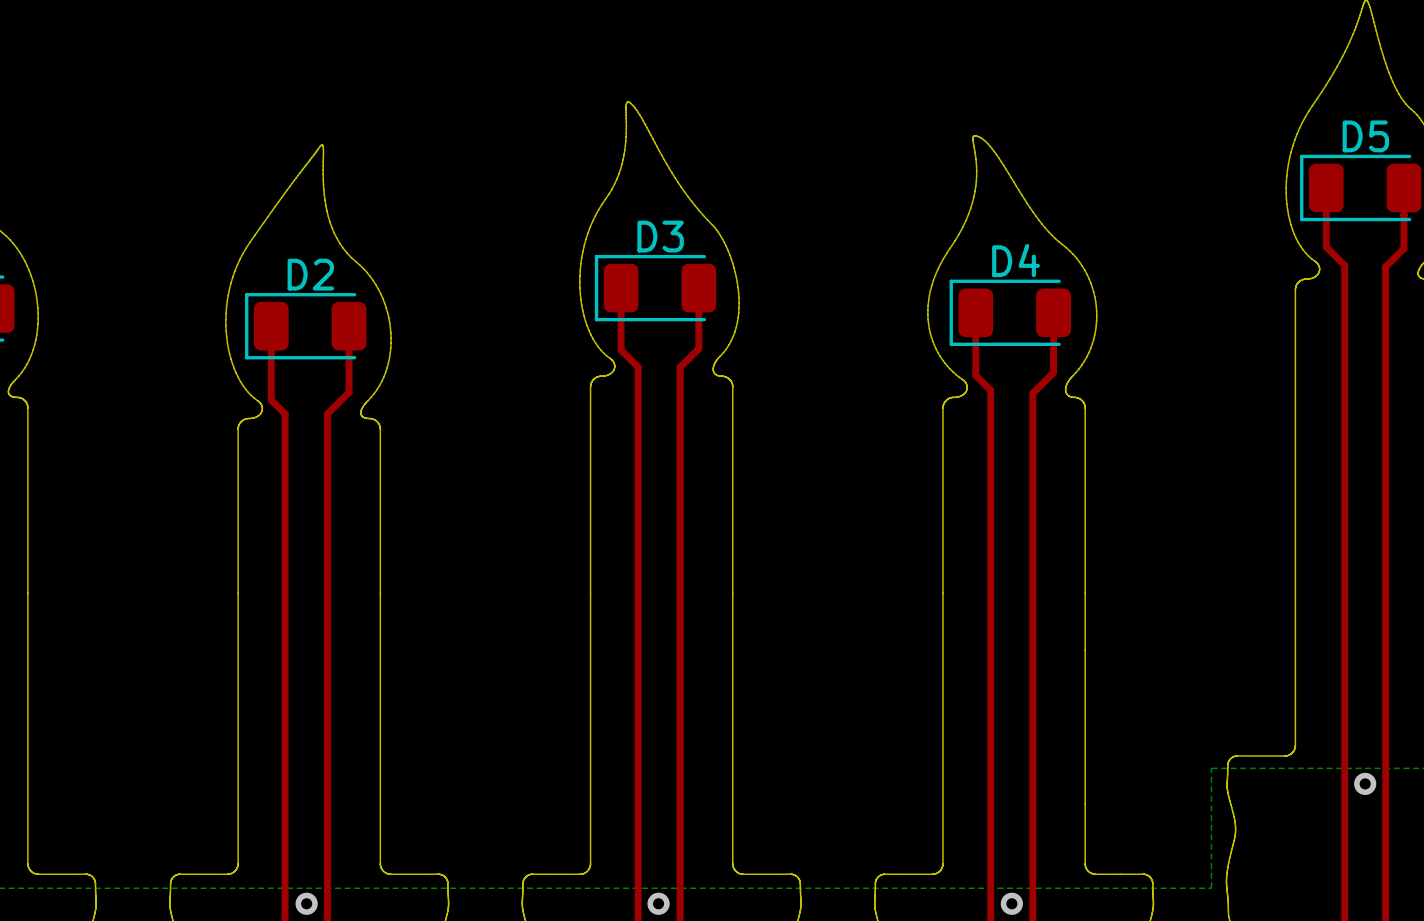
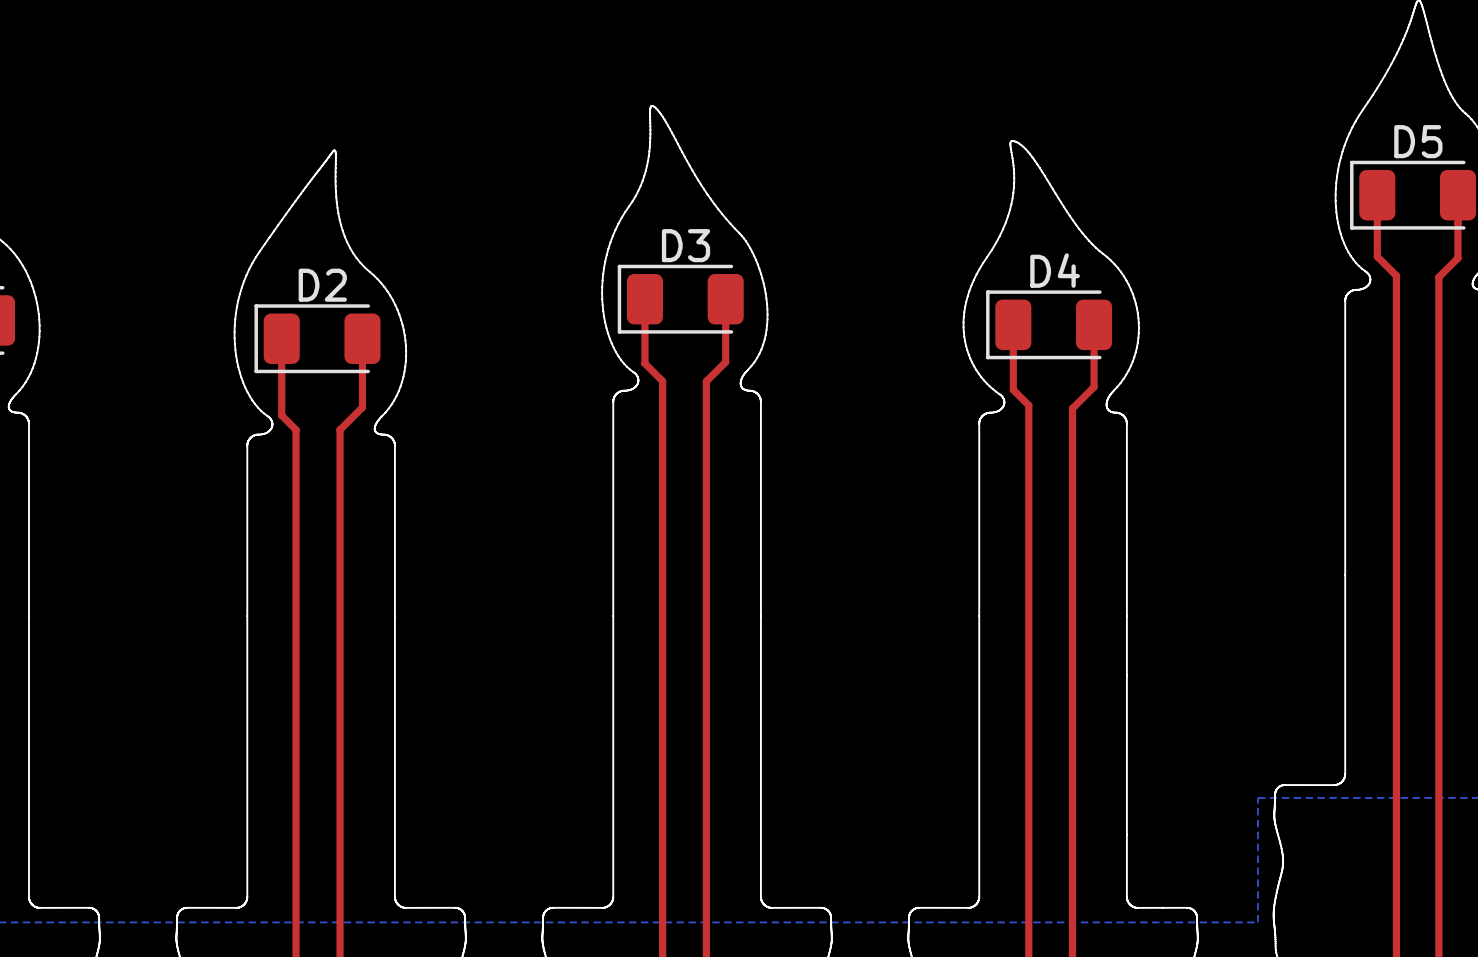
via: (1365, 783) -> none
via: (306, 903) -> none
via: (658, 903) -> none
via: (1011, 903) -> none

